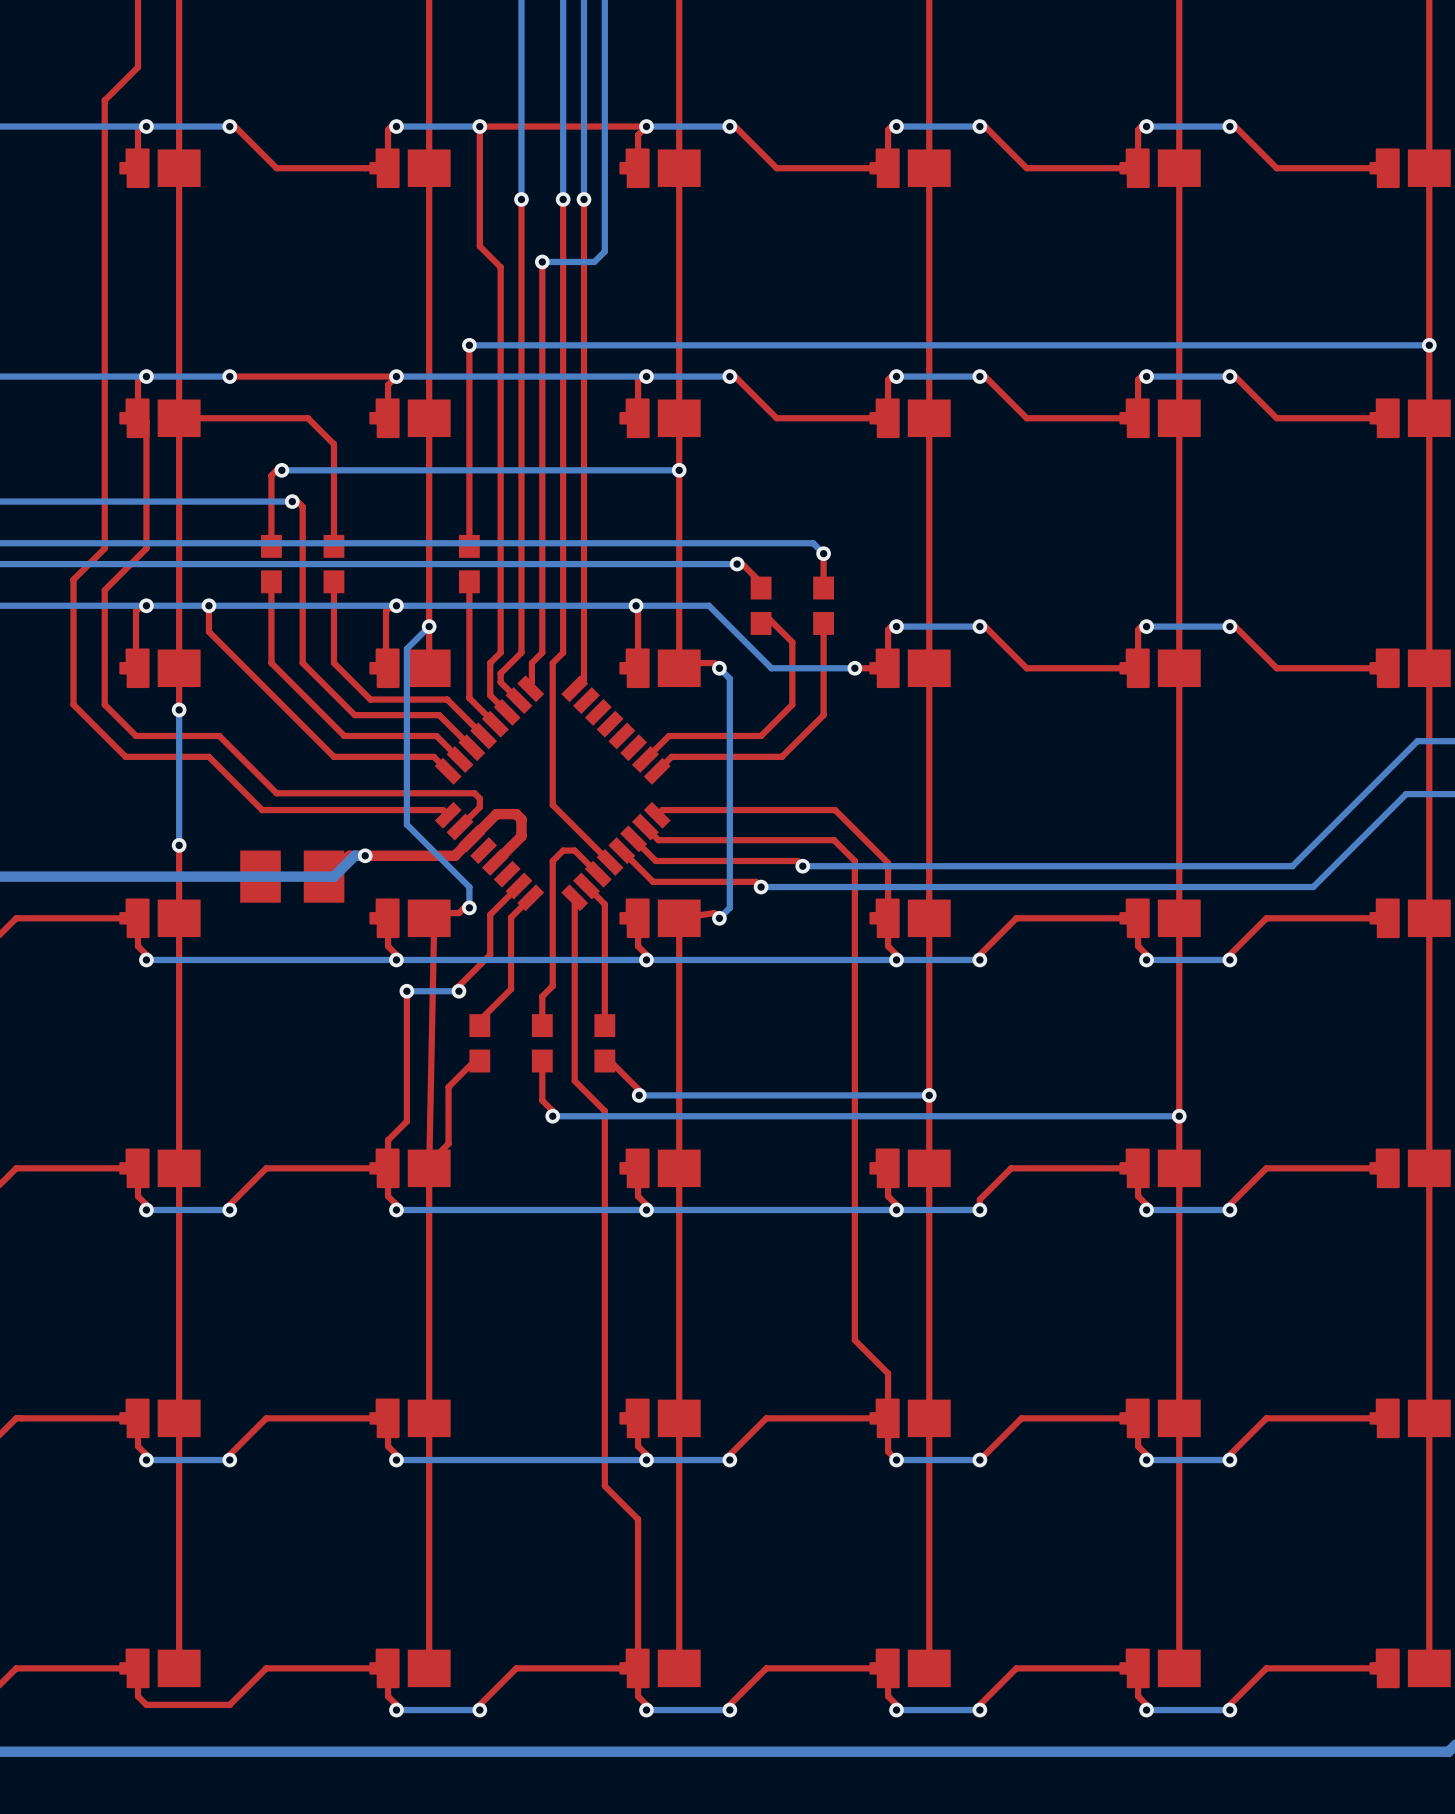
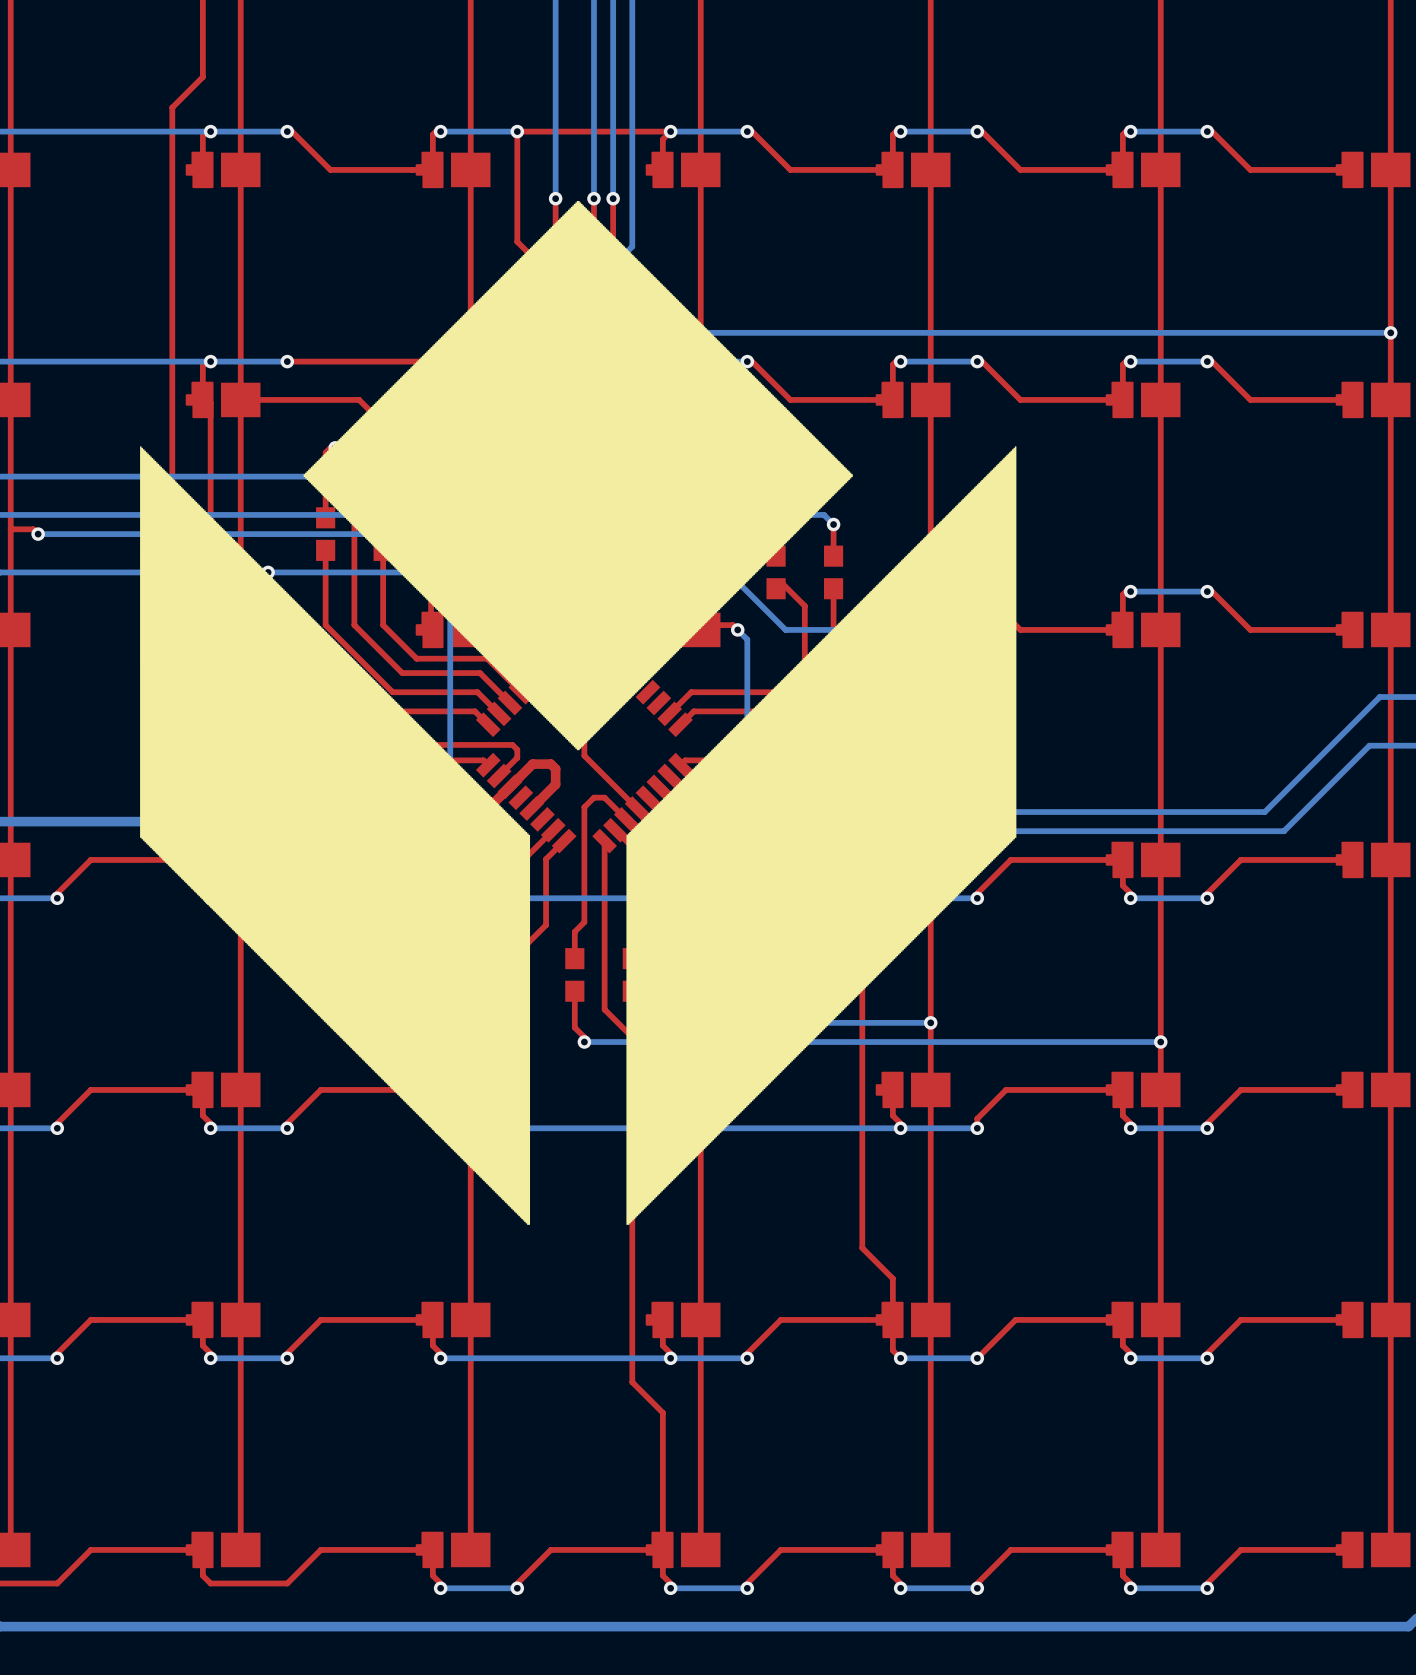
drawing: none -> [303, 201, 853, 751]
drawing: none -> [140, 446, 531, 1225]
drawing: none -> [626, 446, 1017, 1225]

